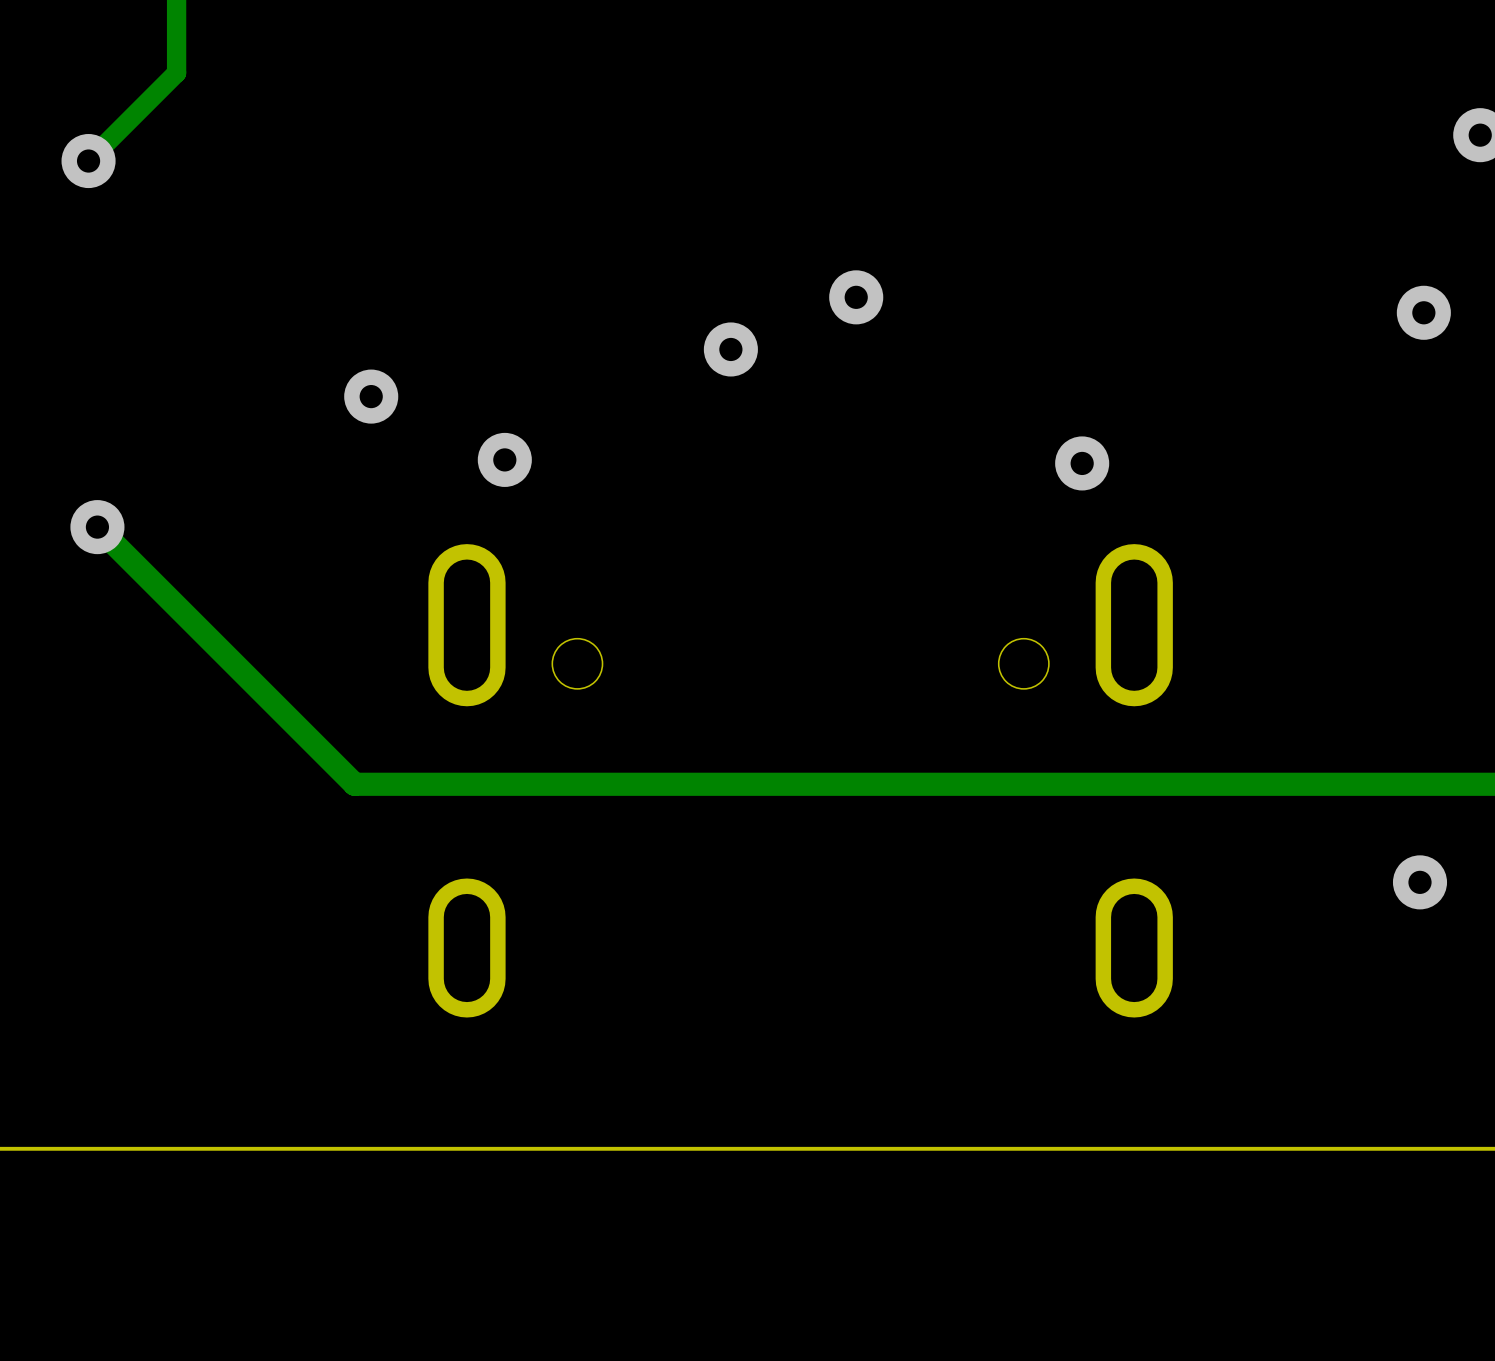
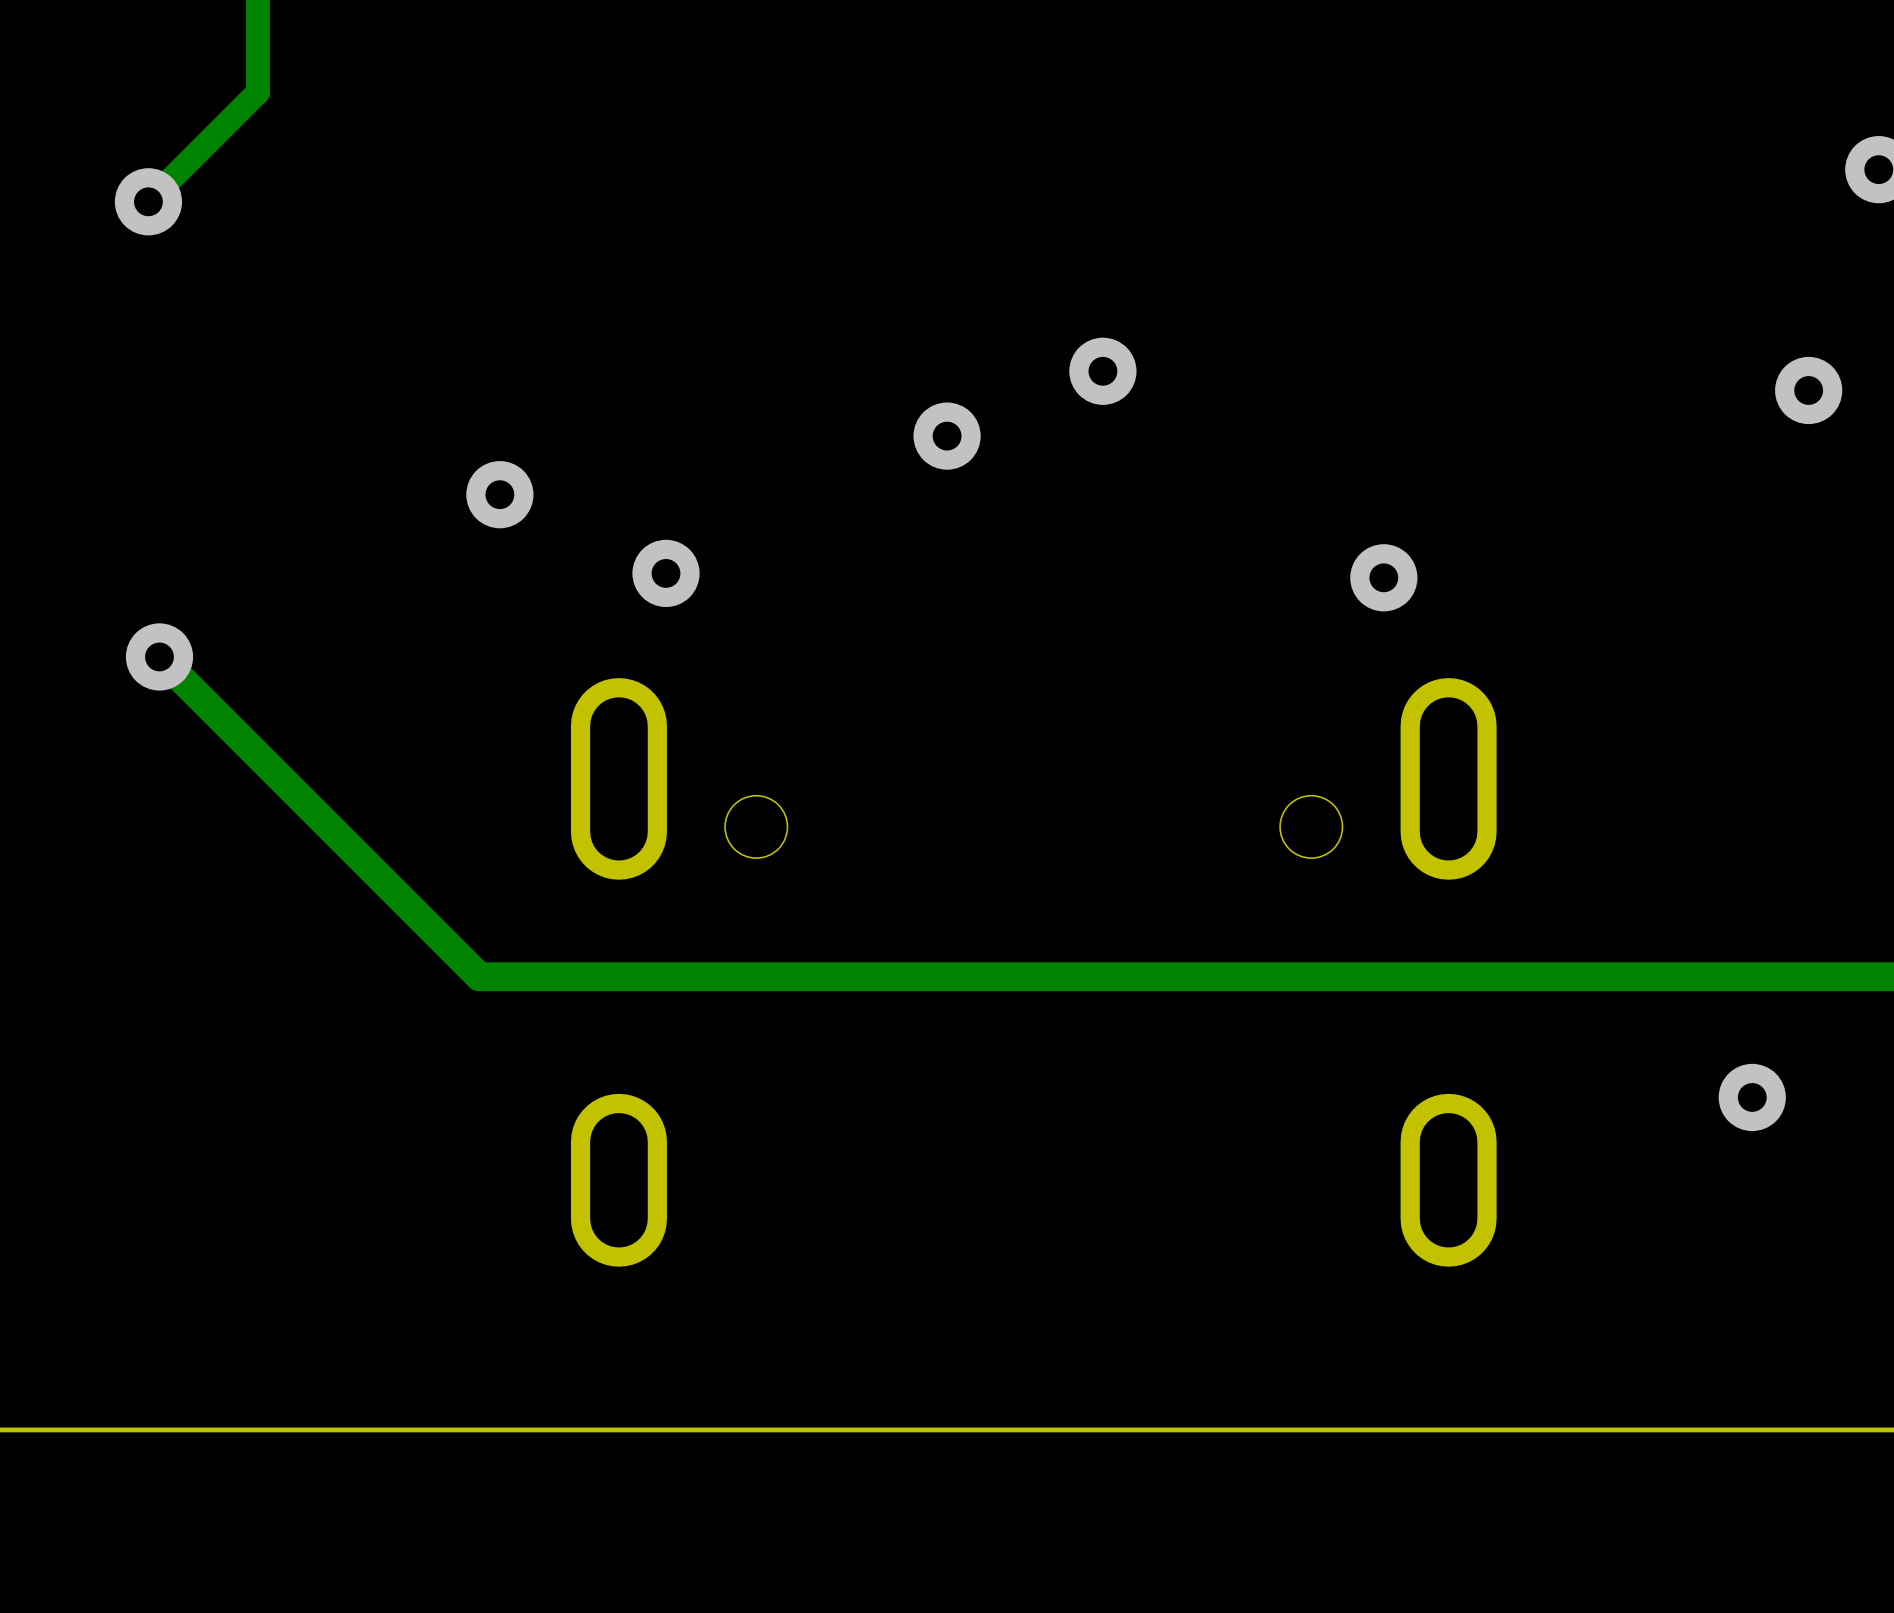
via position: (1420, 882) -> (1752, 1097)

